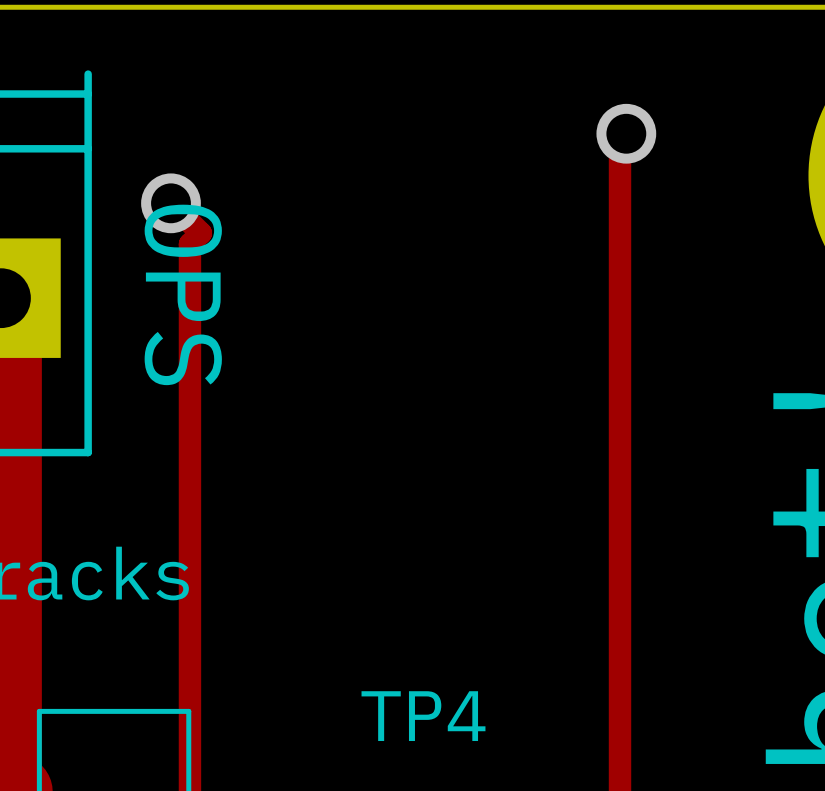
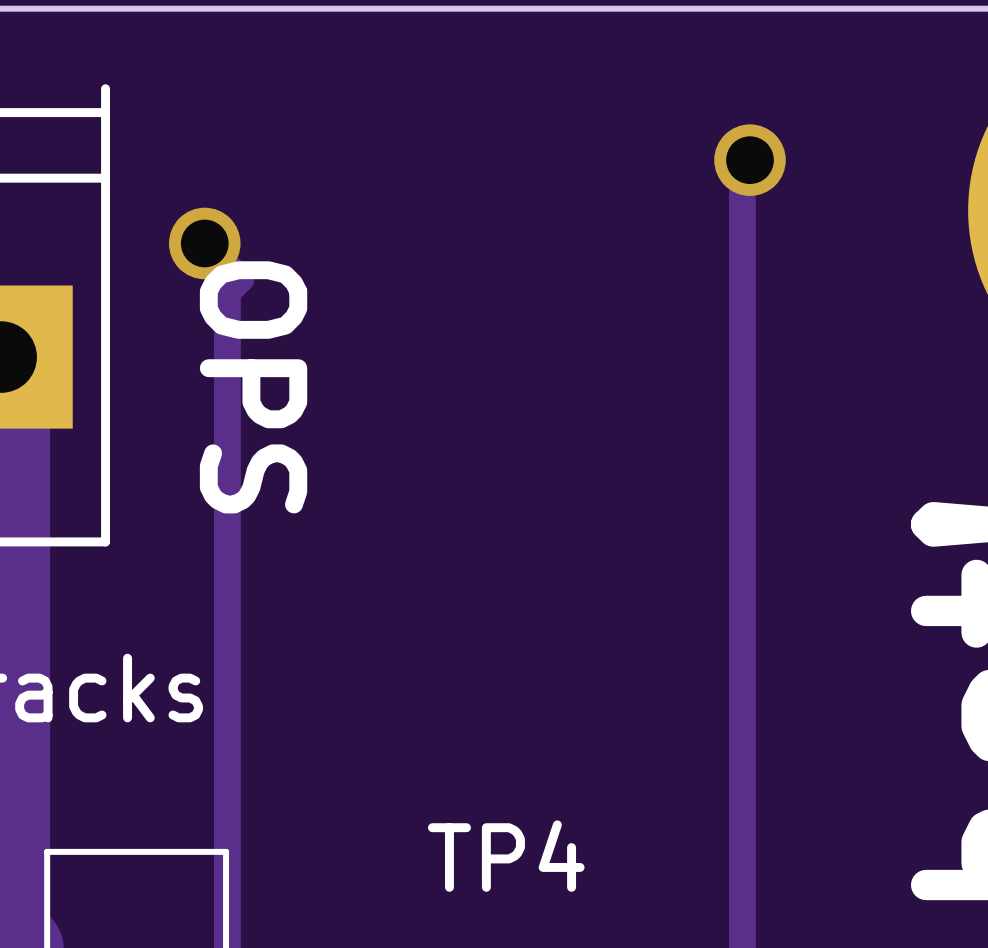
text position: OPS (183, 294) -> OPS (253, 387)

